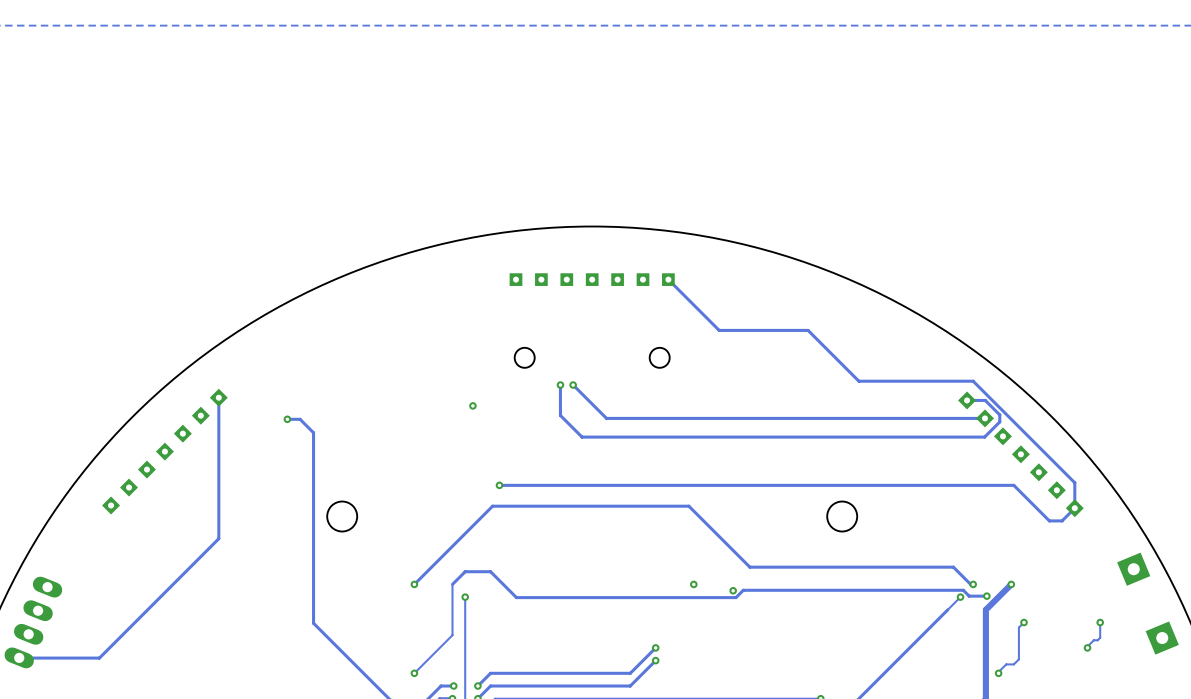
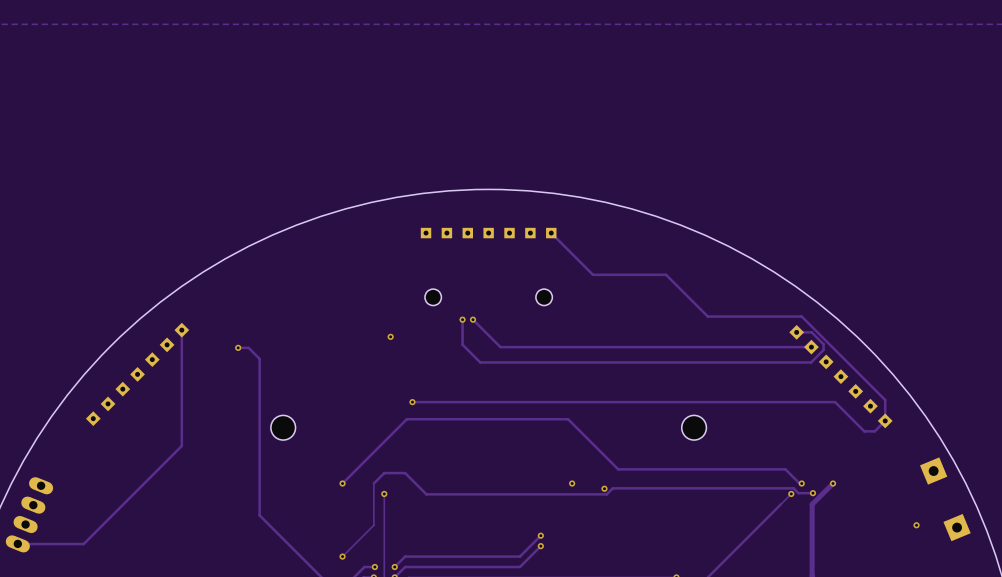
track: (1024, 622) (1018, 627) (1018, 659) (1013, 664) (1006, 664) (998, 673) -> none
via: (1024, 622) -> none
track: (1100, 622) (1100, 637) (1093, 640) (1087, 647) -> none
via: (1100, 622) -> none
via: none -> (916, 525)
via: (1087, 647) -> none
via: (998, 673) -> none

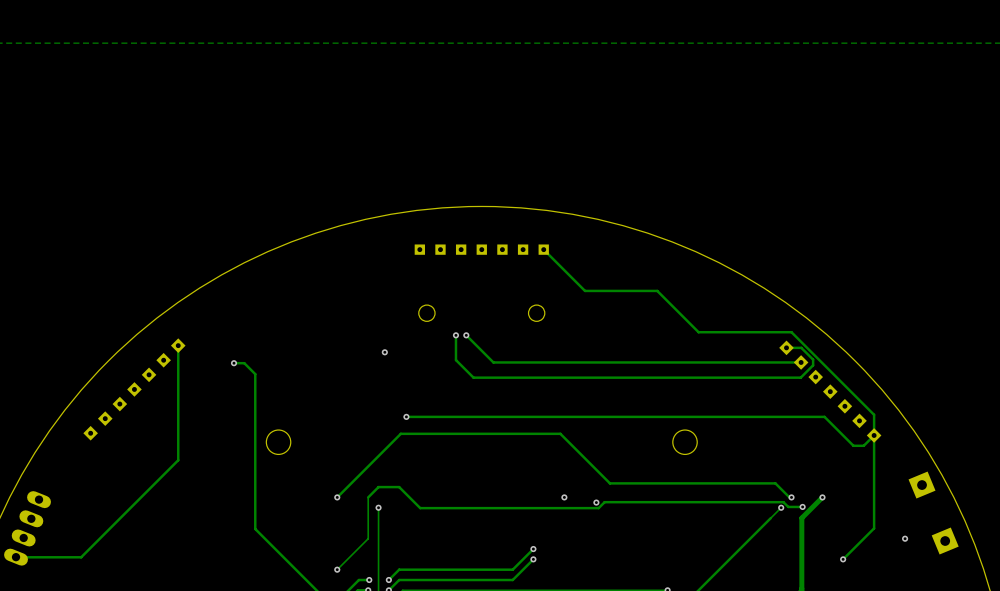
track: none -> (874, 435) (874, 528) (843, 559)
via: none -> (843, 559)

